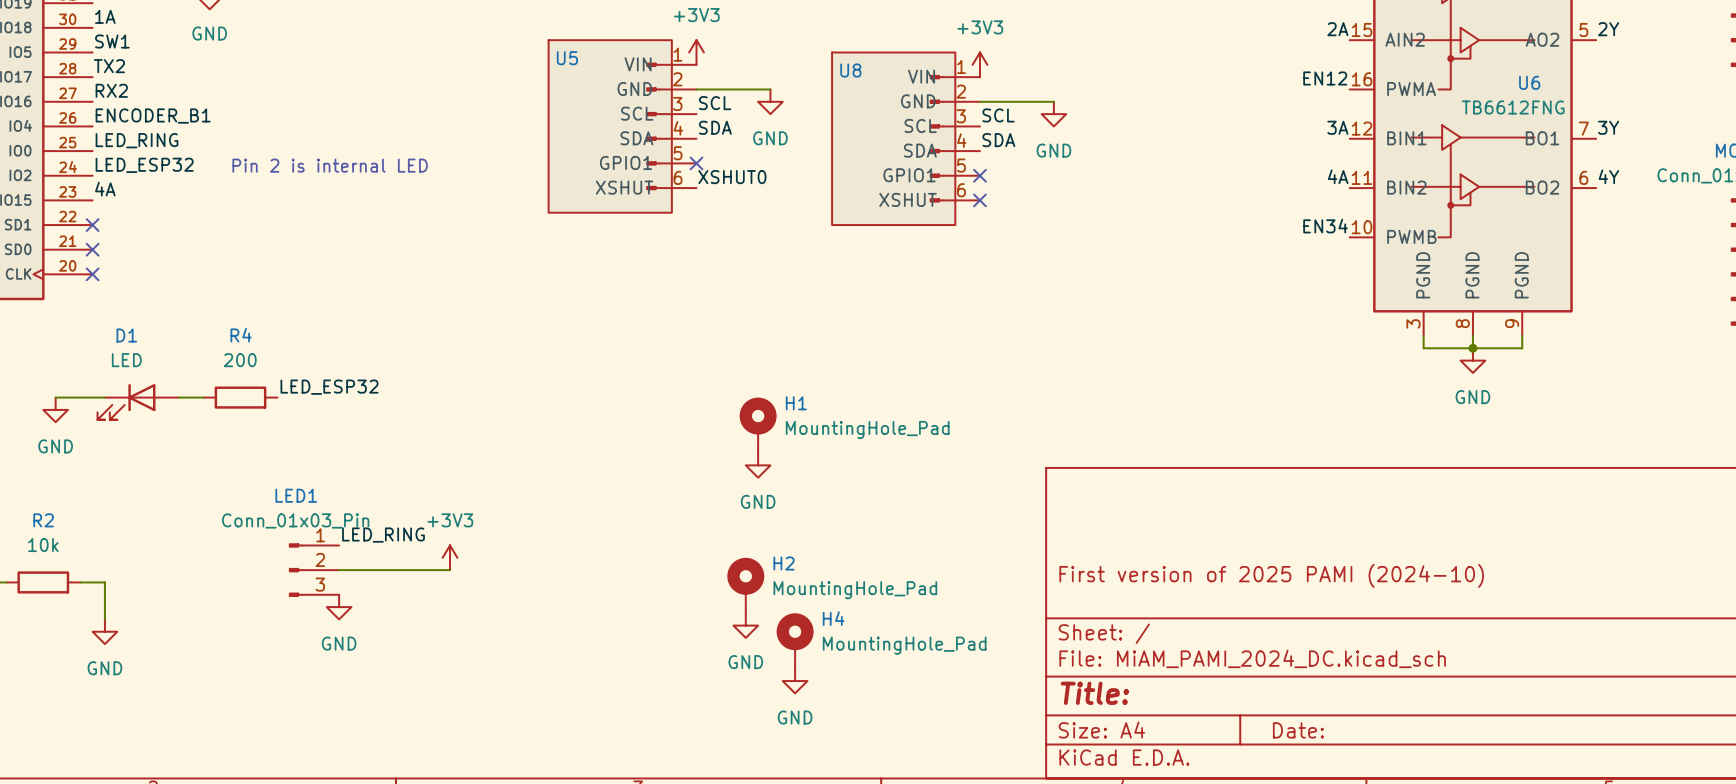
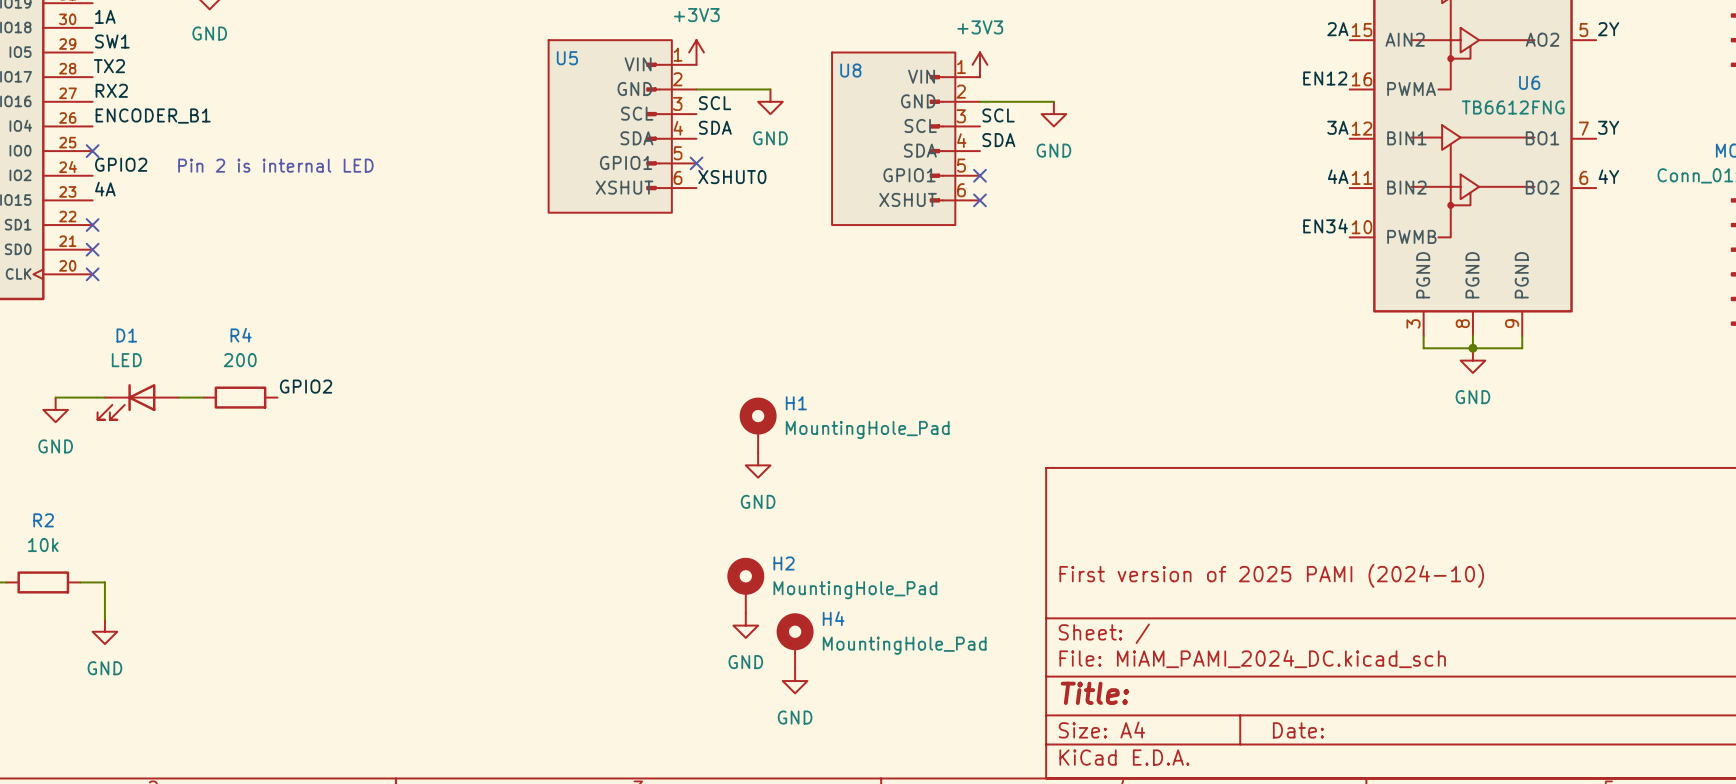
label: LED_RING (137, 140) -> none
no-connect mark: none -> (92, 151)
label: LED_ESP32 (144, 165) -> GPIO2 (121, 164)
text position: Pin 2 is internal LED (330, 165) -> Pin 2 is internal LED (275, 165)
label: LED_ESP32 (329, 387) -> GPIO2 (306, 386)
label: LED_RING (383, 535) -> none
power symbol: +3V3 (450, 557) -> none
LED1: Conn_01x03_Pin (314, 570) -> none
wire: (339, 570) (450, 570) -> none
power symbol: GND (339, 607) -> none

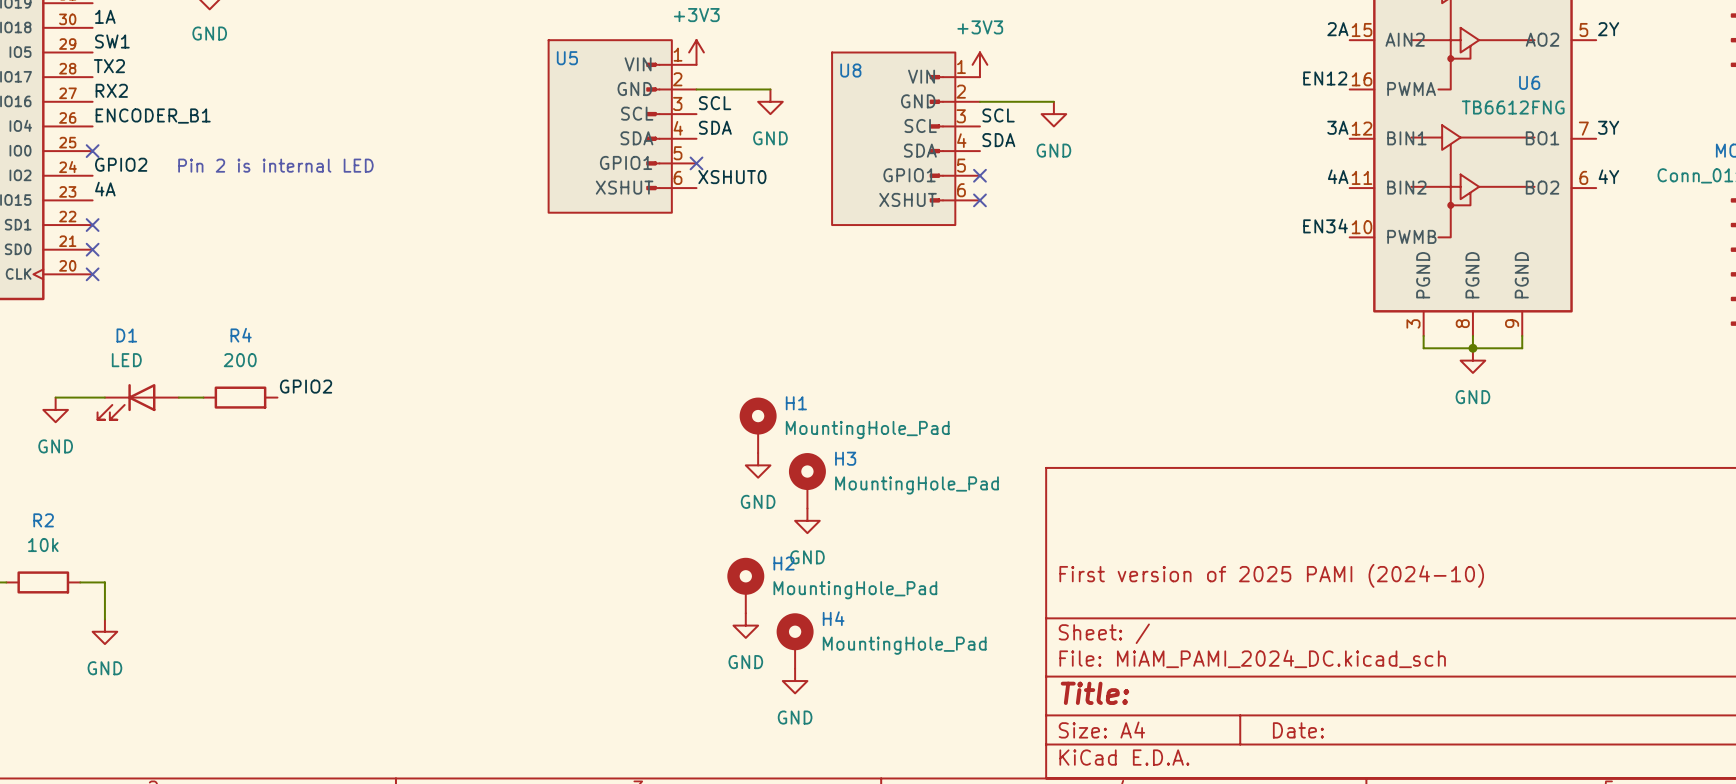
H3: none -> MountingHole_Pad (807, 480)
power symbol: none -> GND (807, 520)

